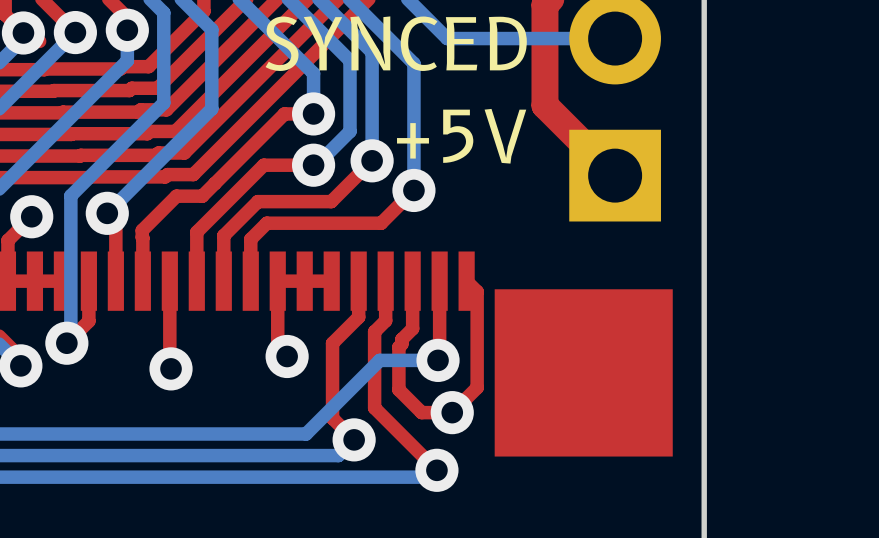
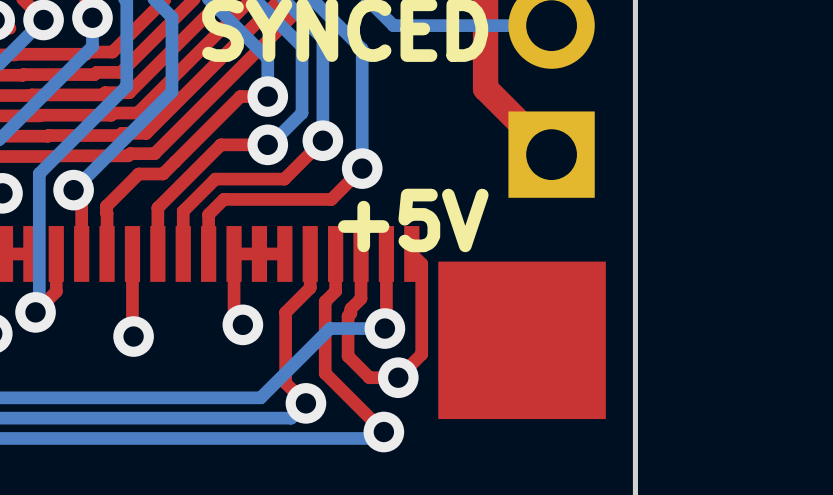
text position: +5V (461, 136) -> +5V (413, 220)

